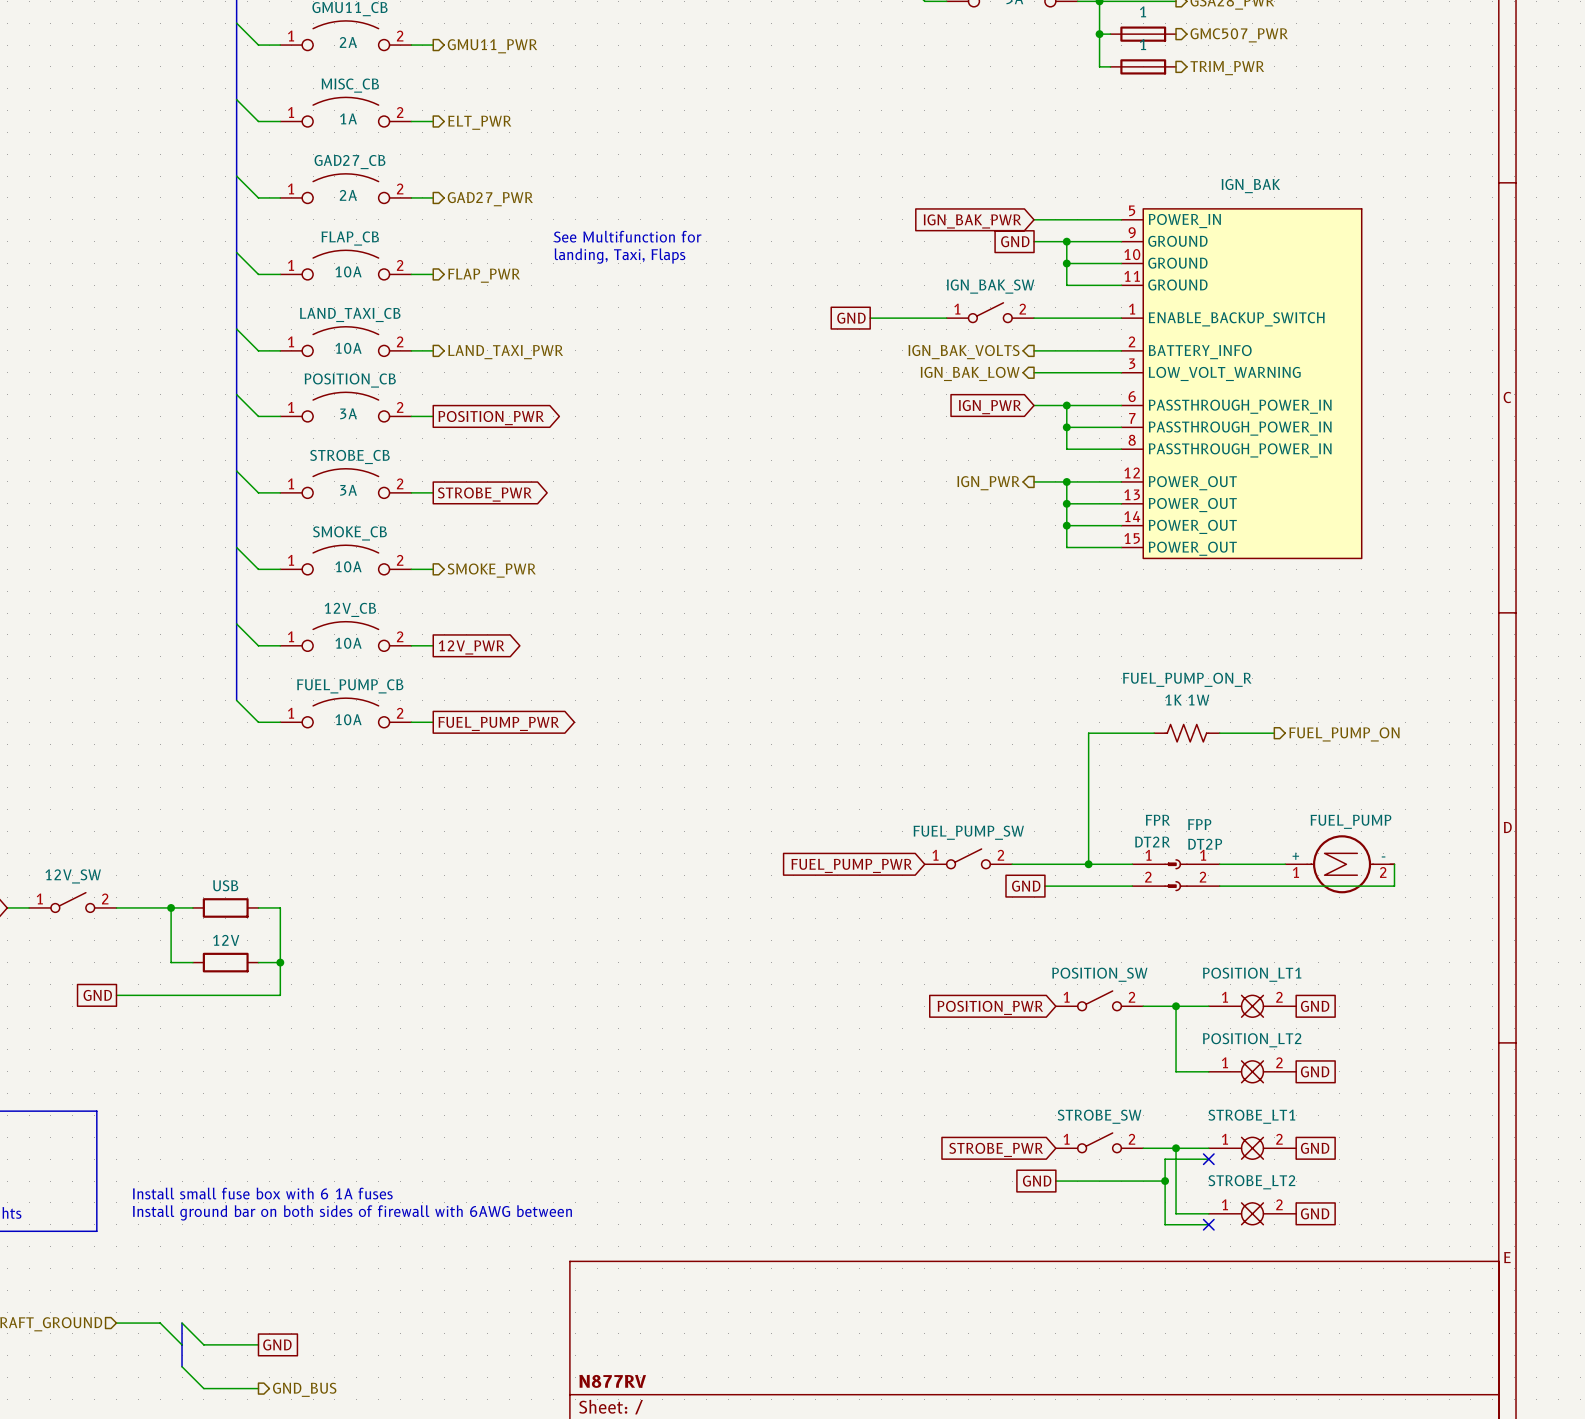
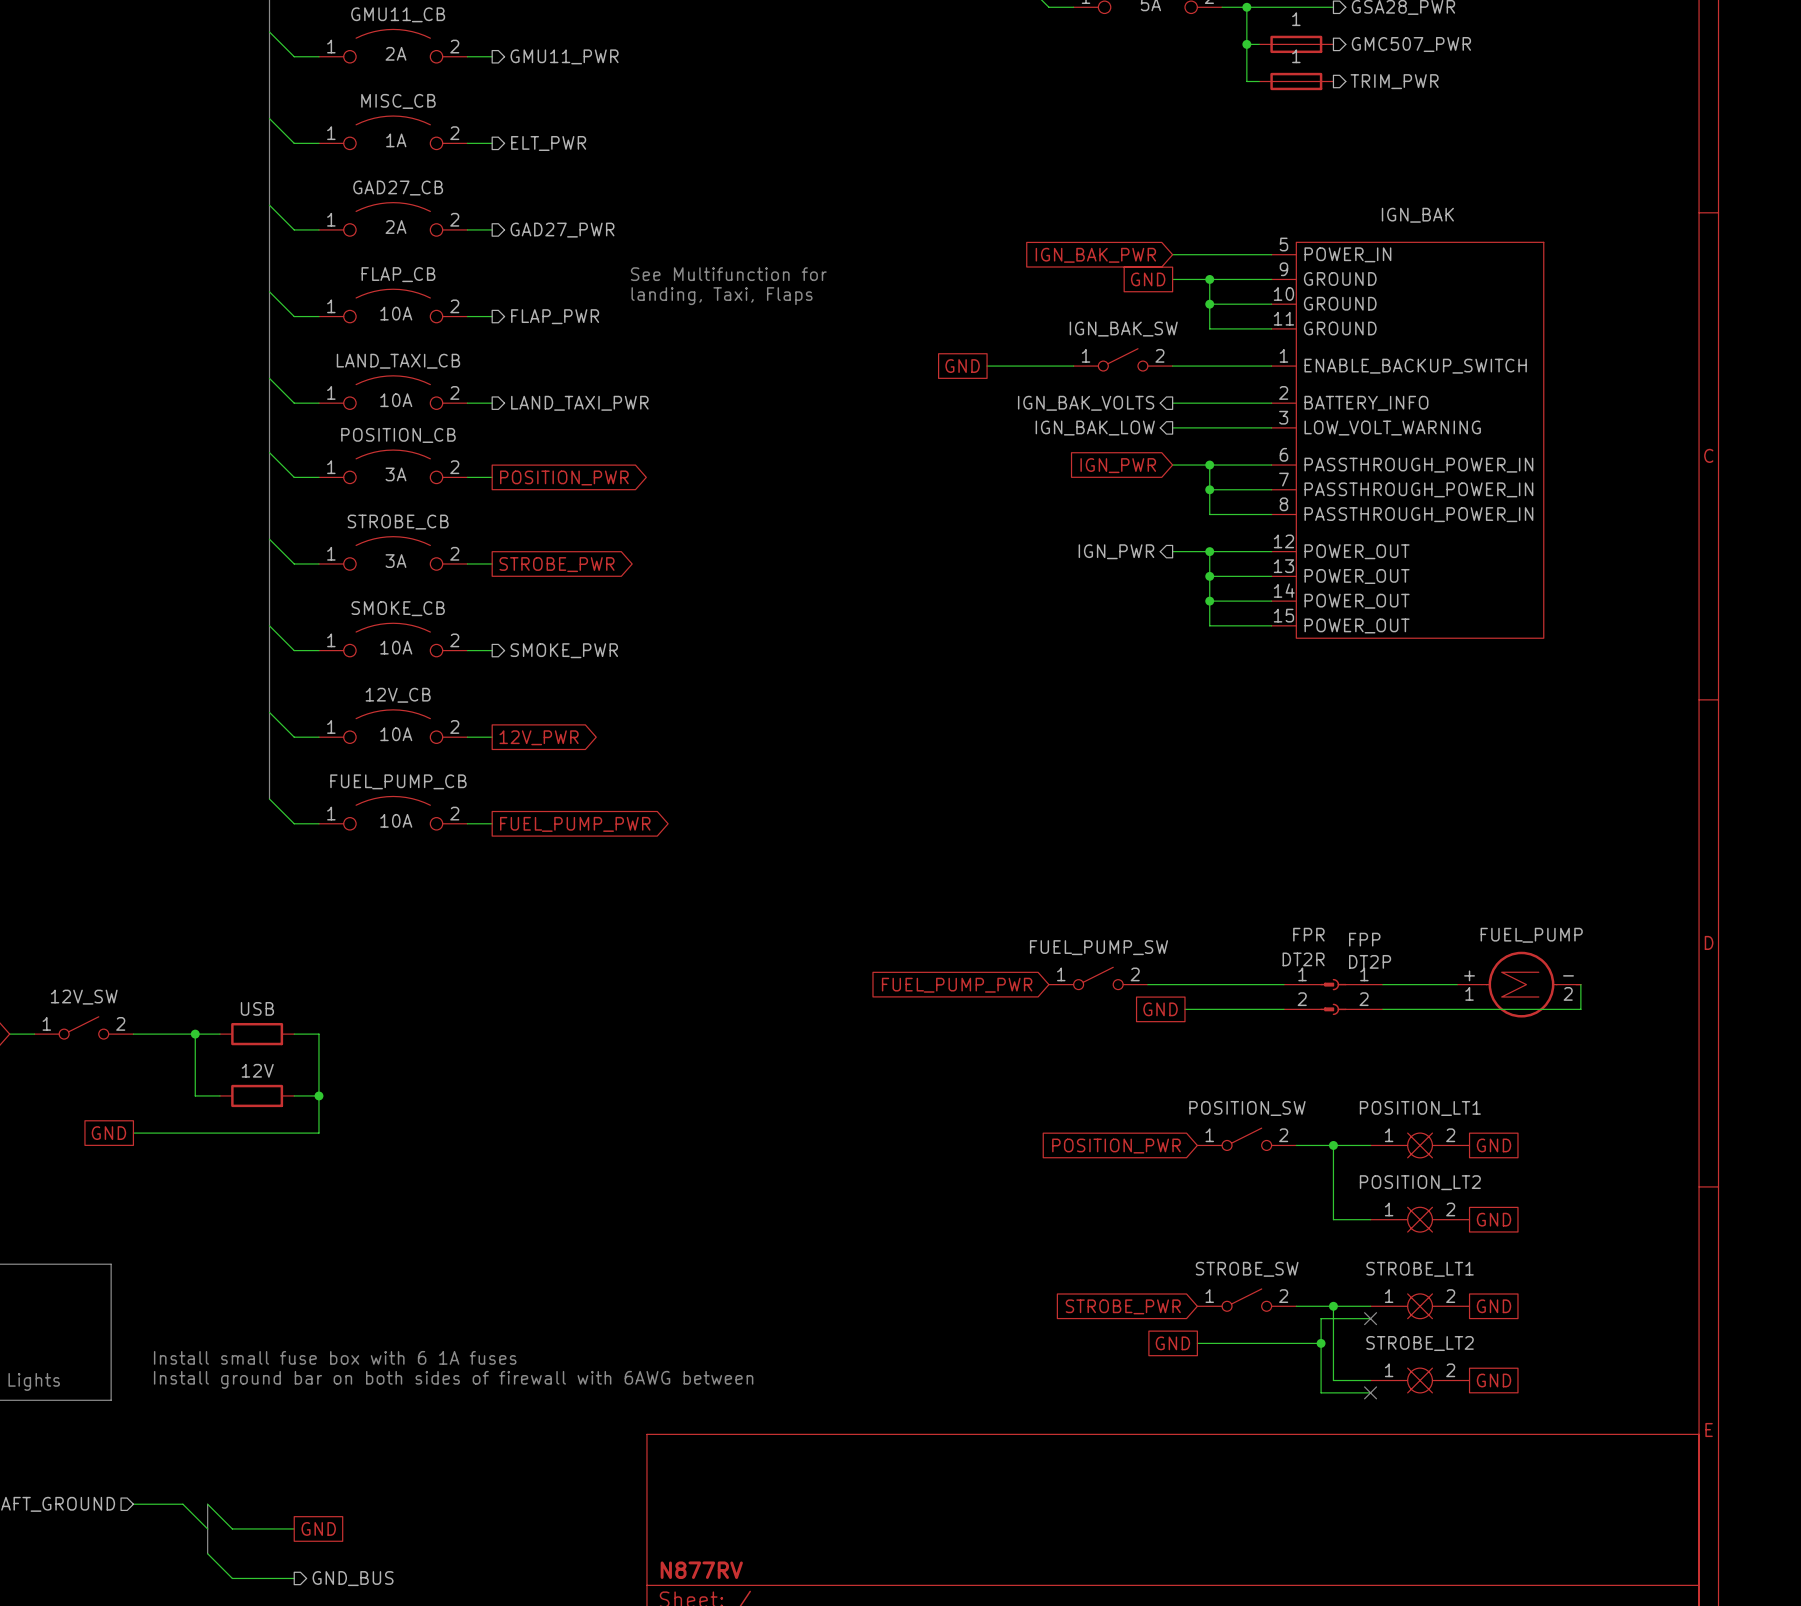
wire: (1154, 733) (1088, 733) (1088, 864) -> none
FUEL_PUMP_ON_R: 1K 1W (1186, 733) -> none
wire: (1219, 733) (1274, 733) -> none
hierarchical label: FUEL_PUMP_ON (1344, 734) -> none
junction: (1088, 864) -> none

